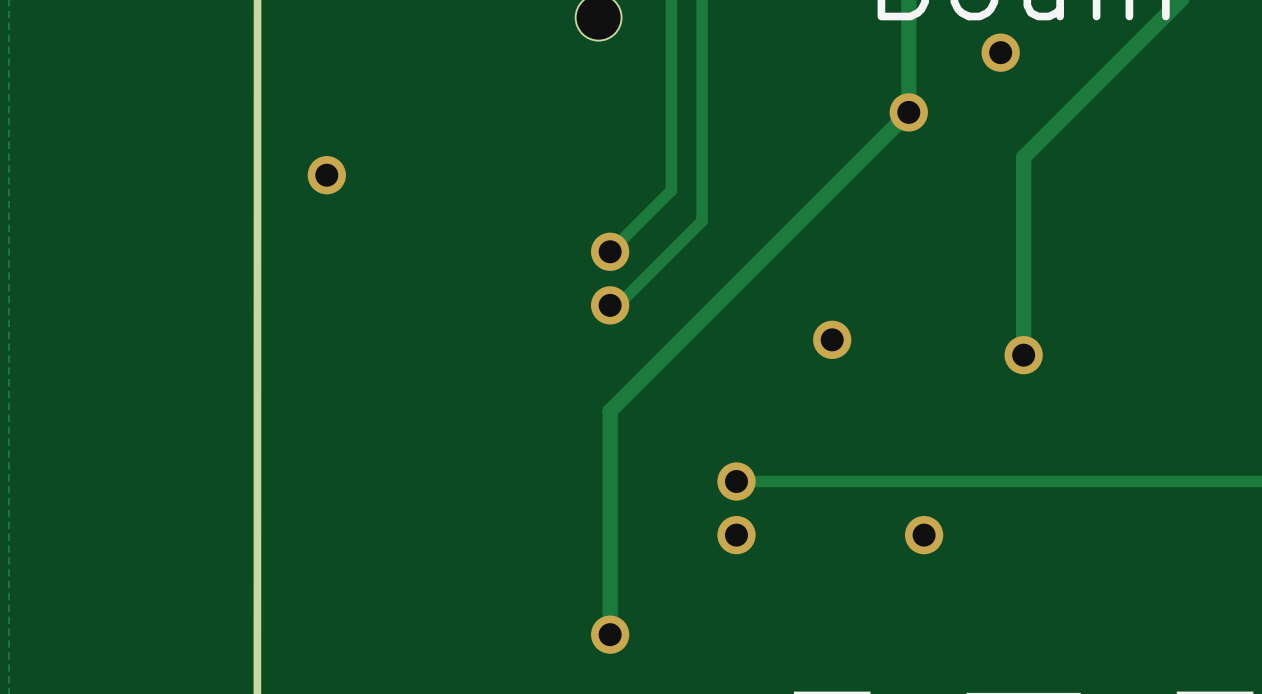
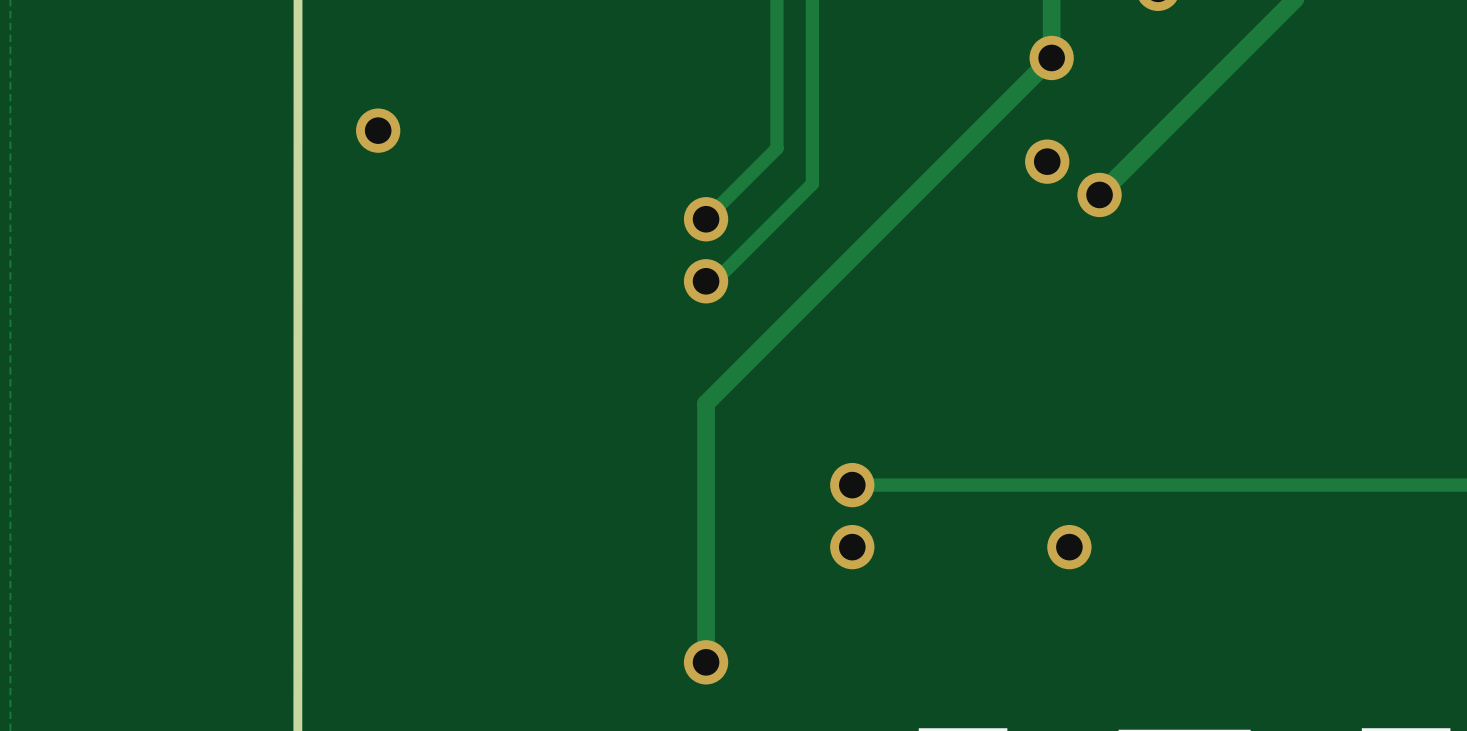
track: (1023, 157) (1023, 355) -> (1184, 109) (1099, 194)
via: none -> (1047, 161)
via: none -> (1099, 194)
via: (832, 339) -> none
via: (1023, 355) -> none

